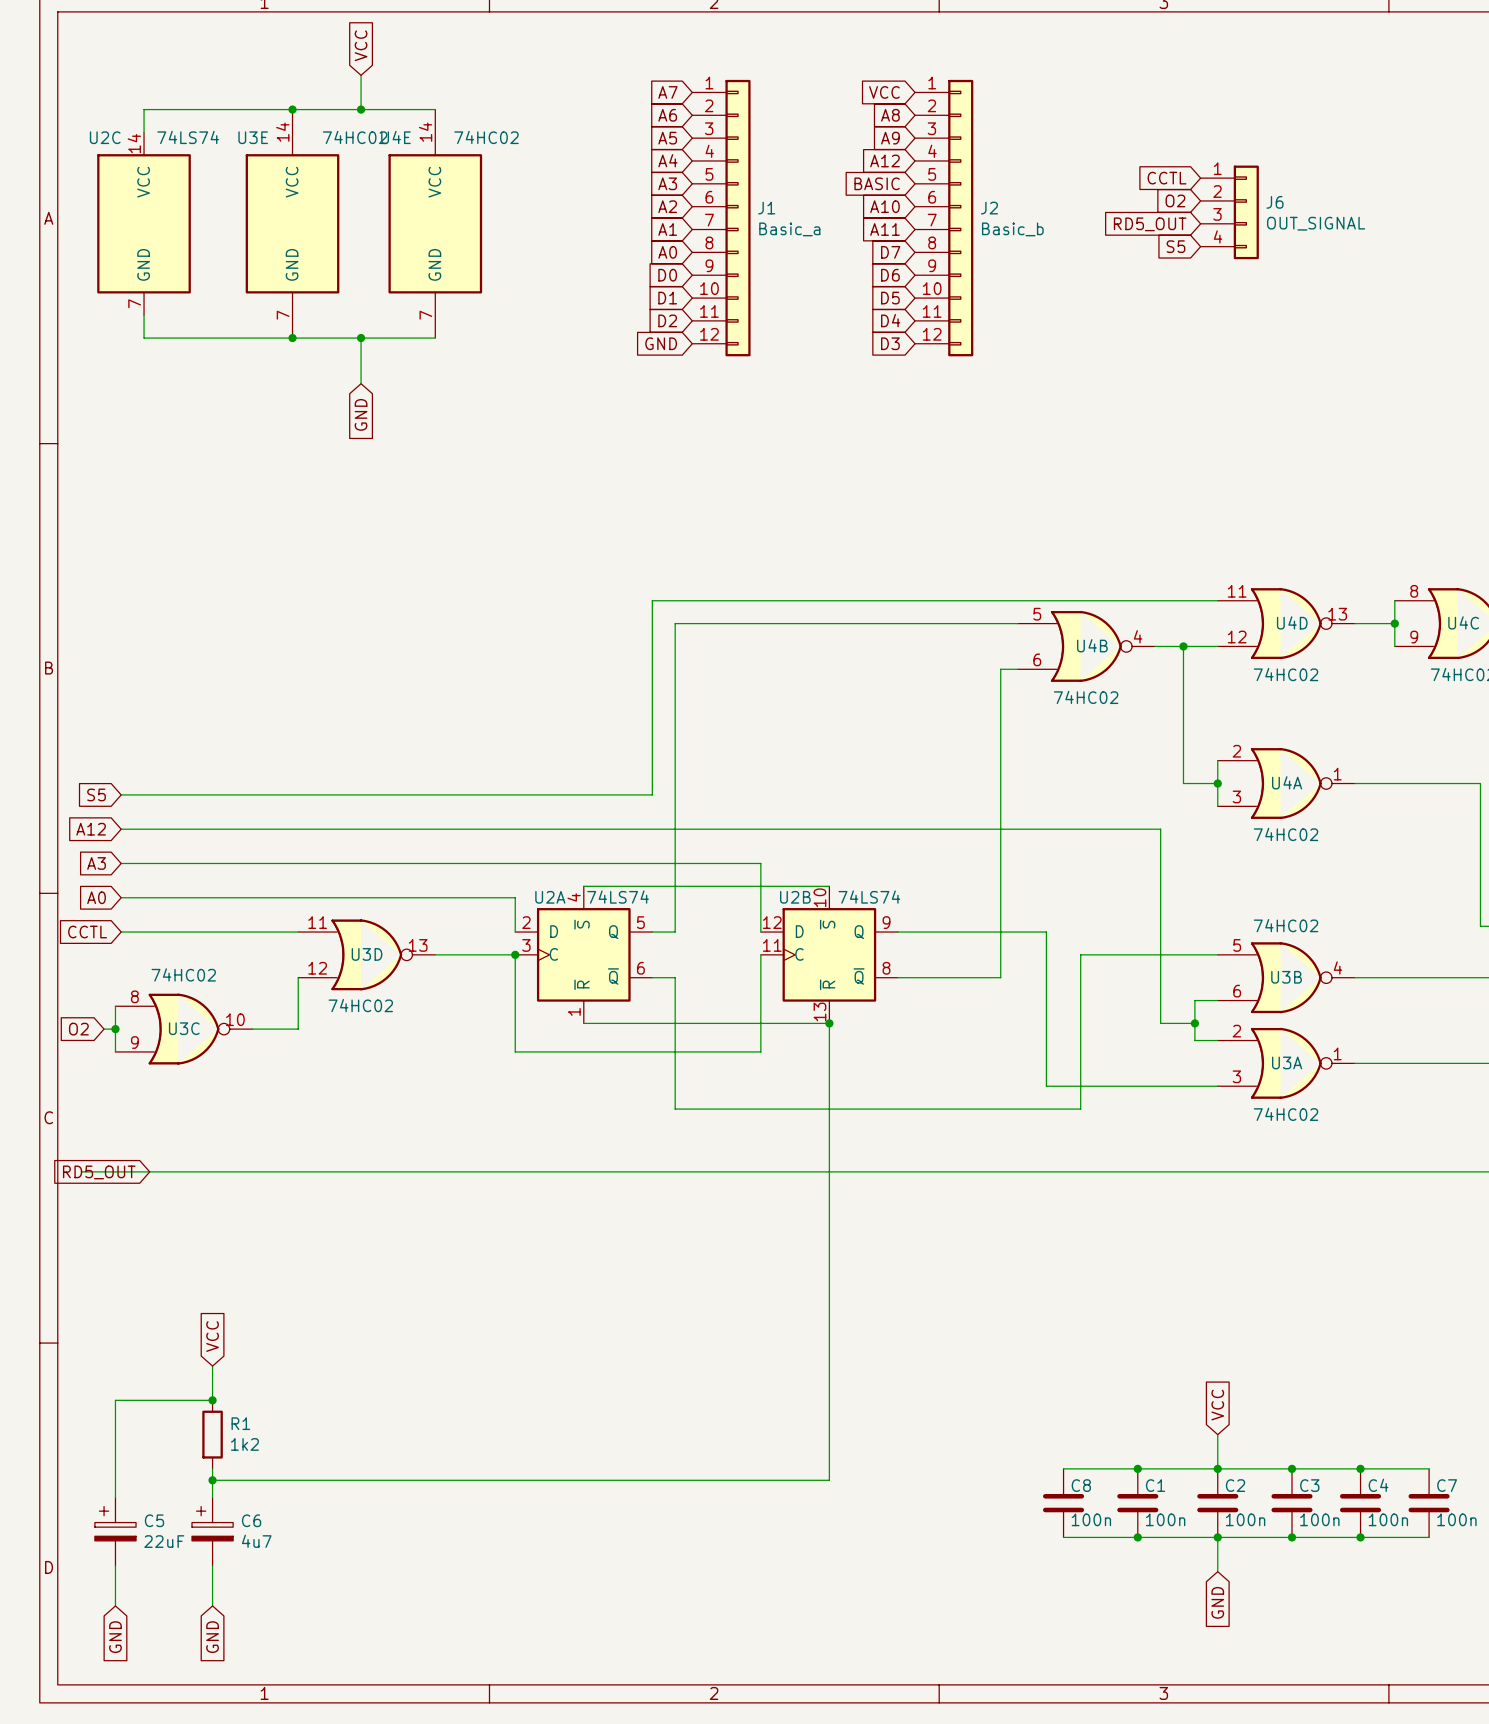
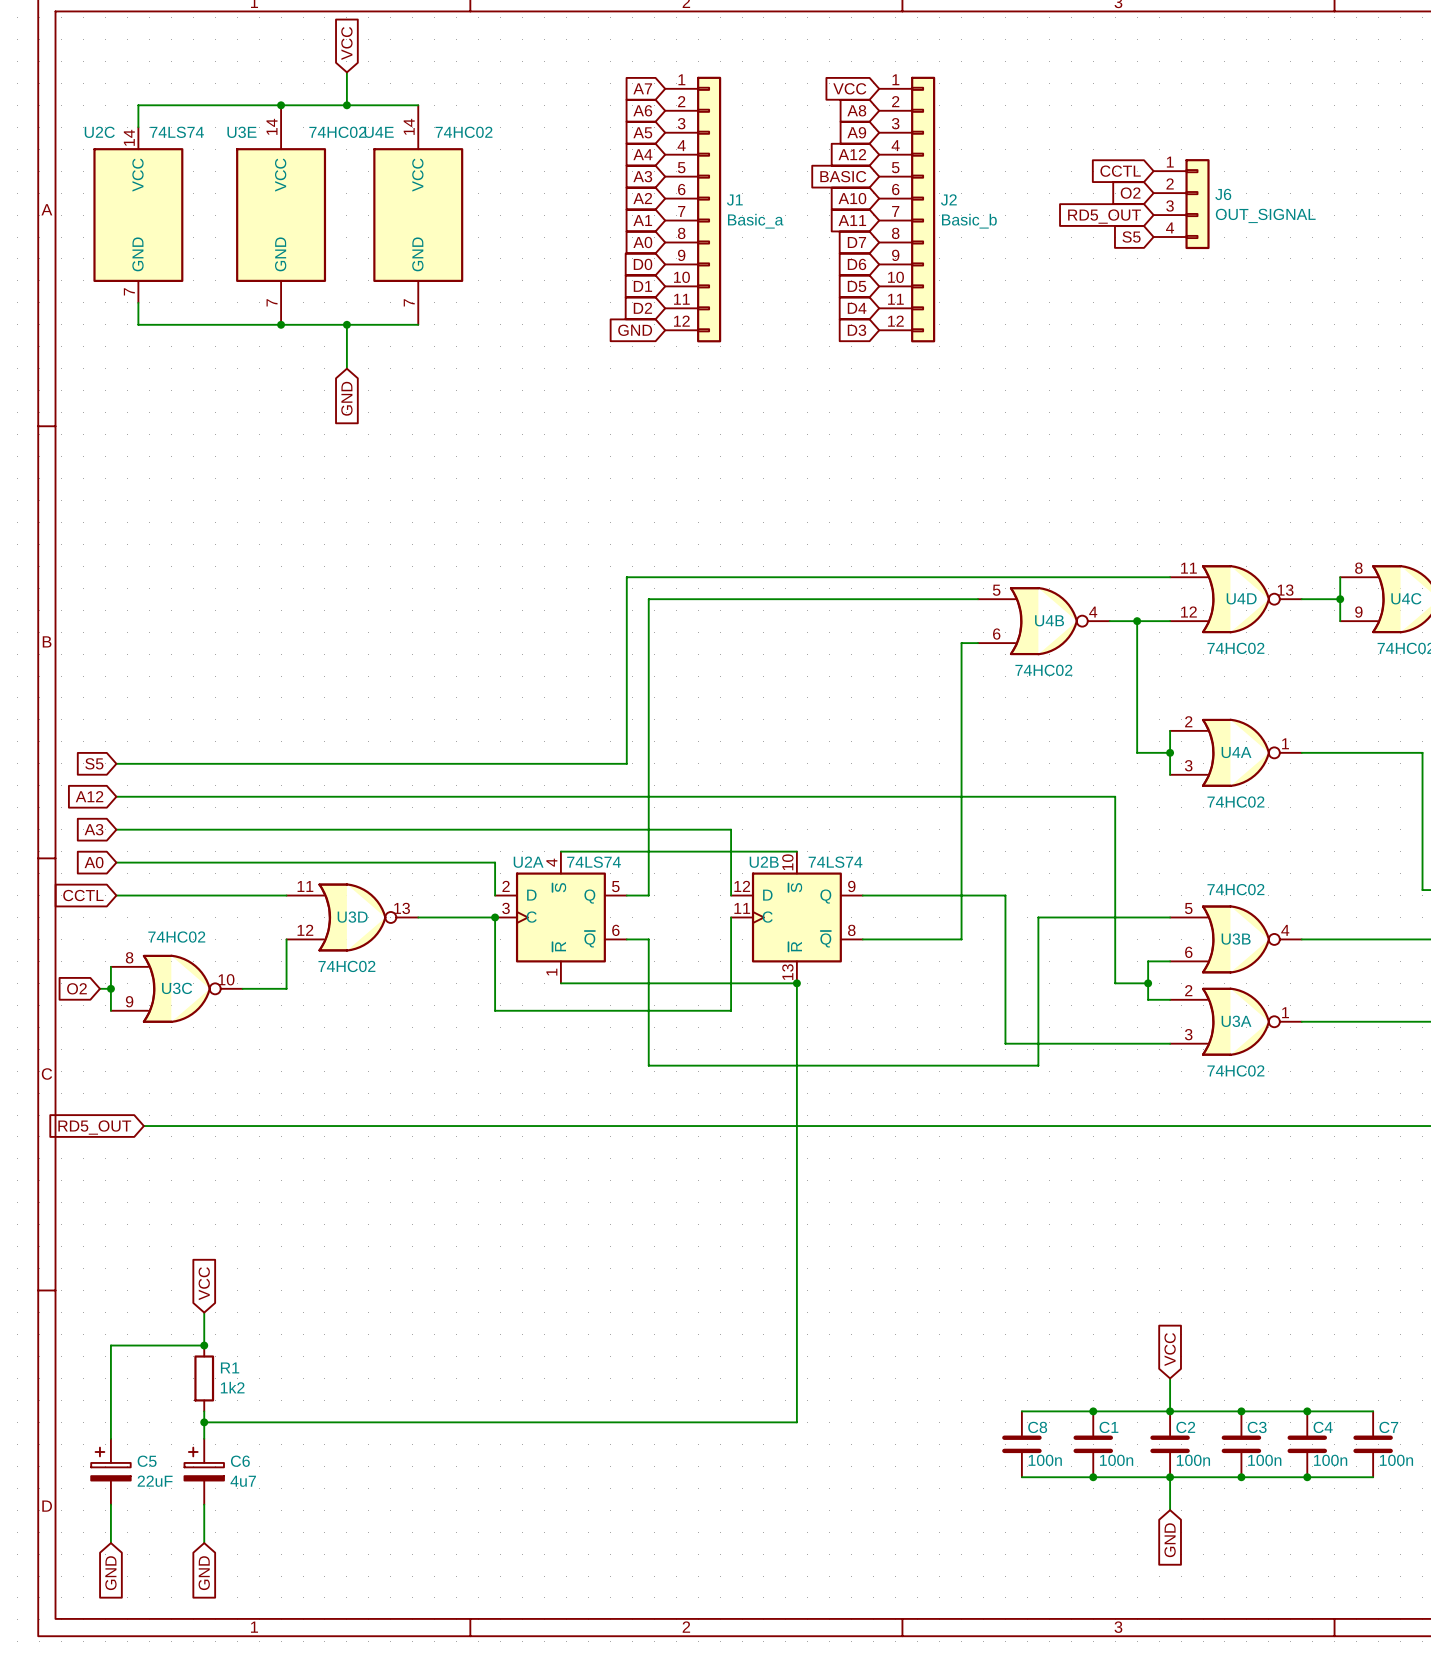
wire: (81, 1171) (149, 1171) -> none

